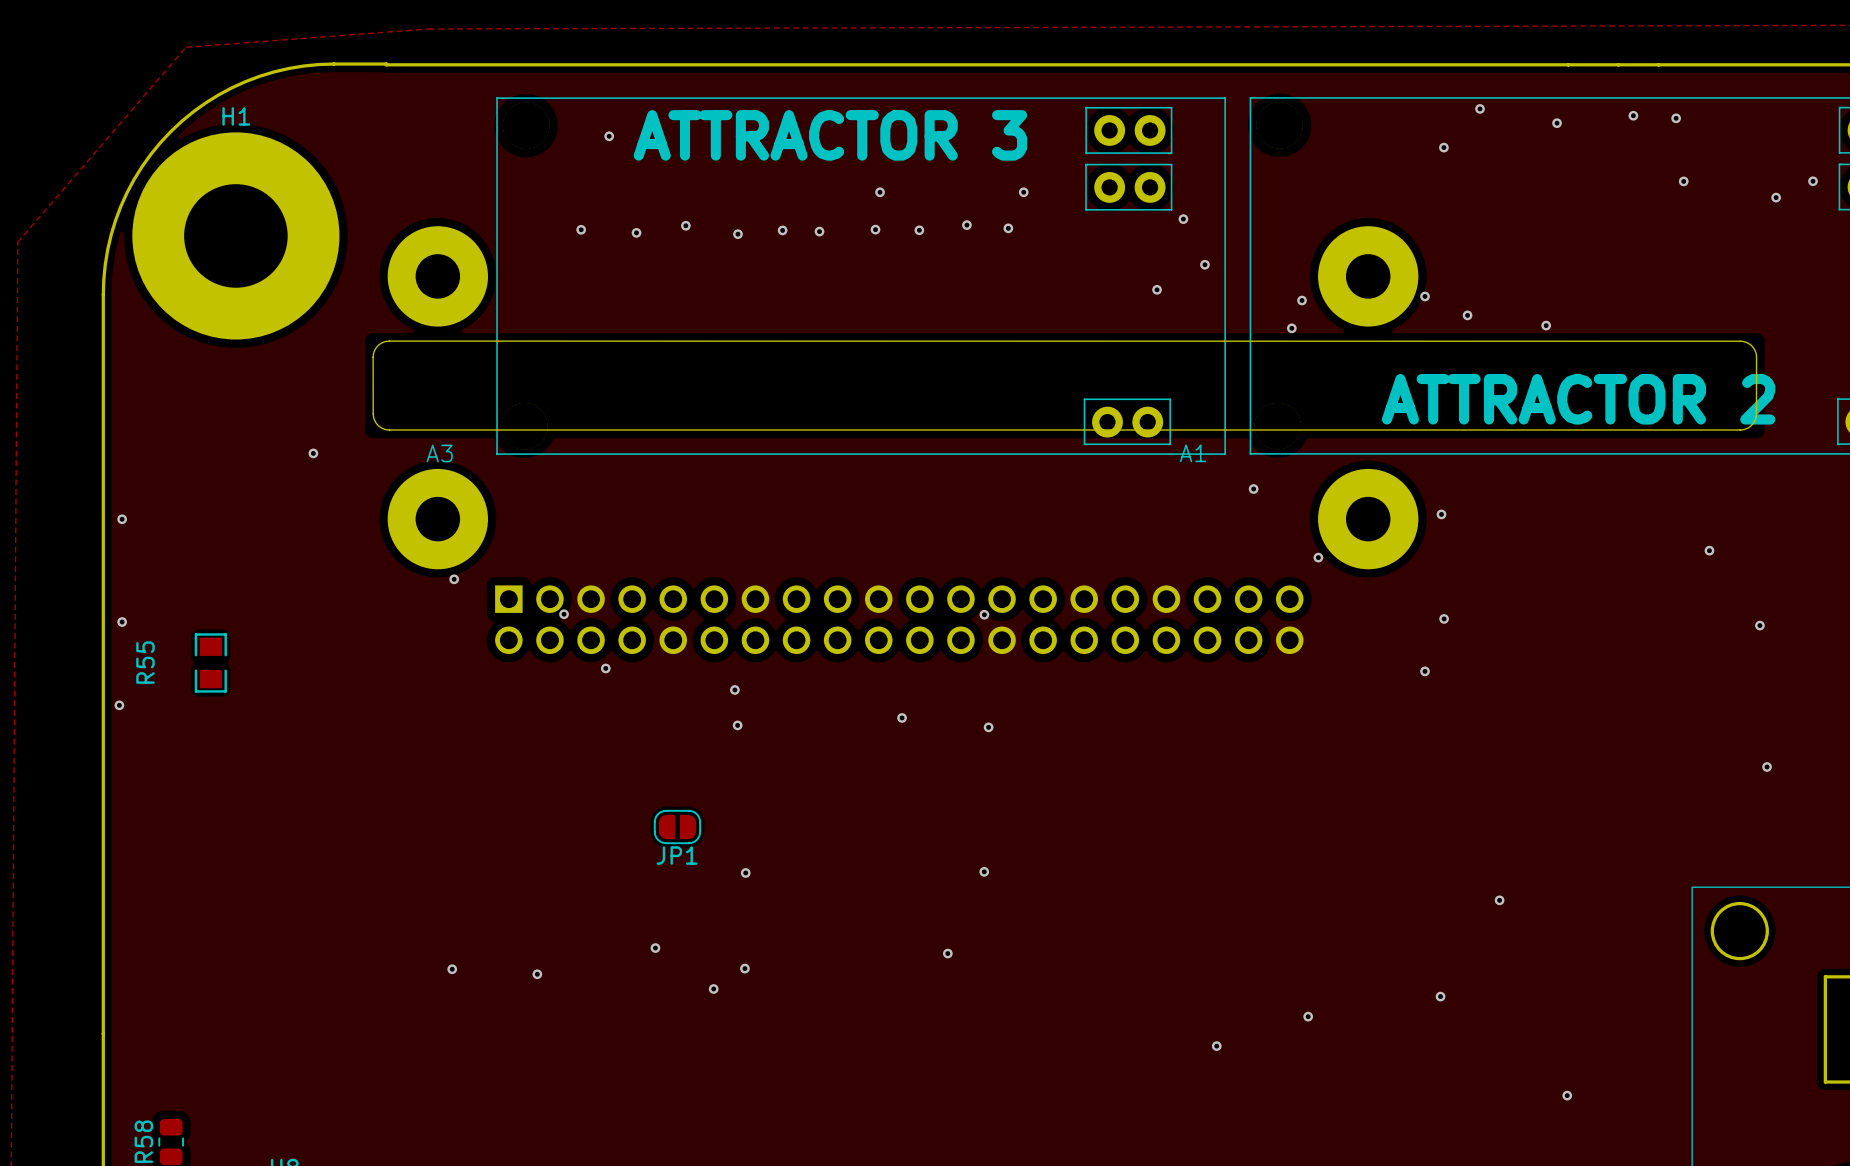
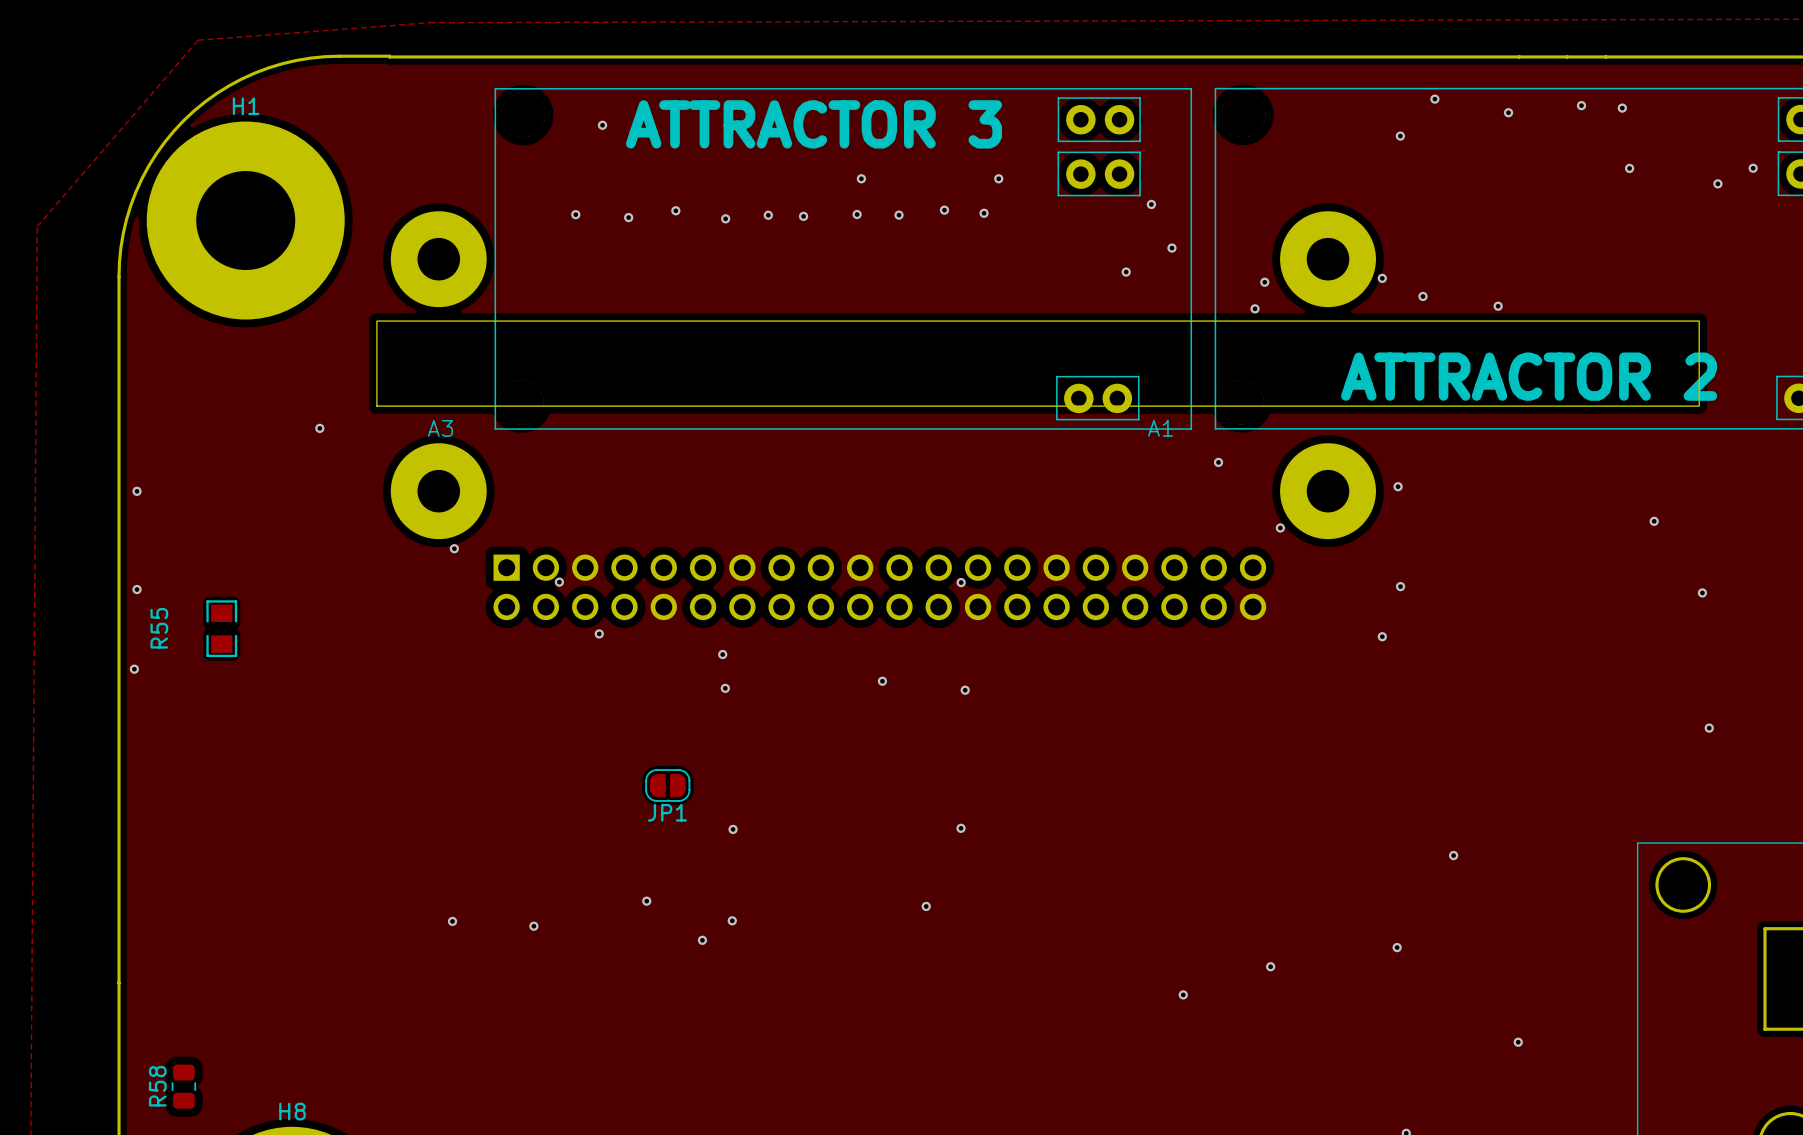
part footprint: [372, 226, 1757, 570] -> [376, 211, 1700, 540]

